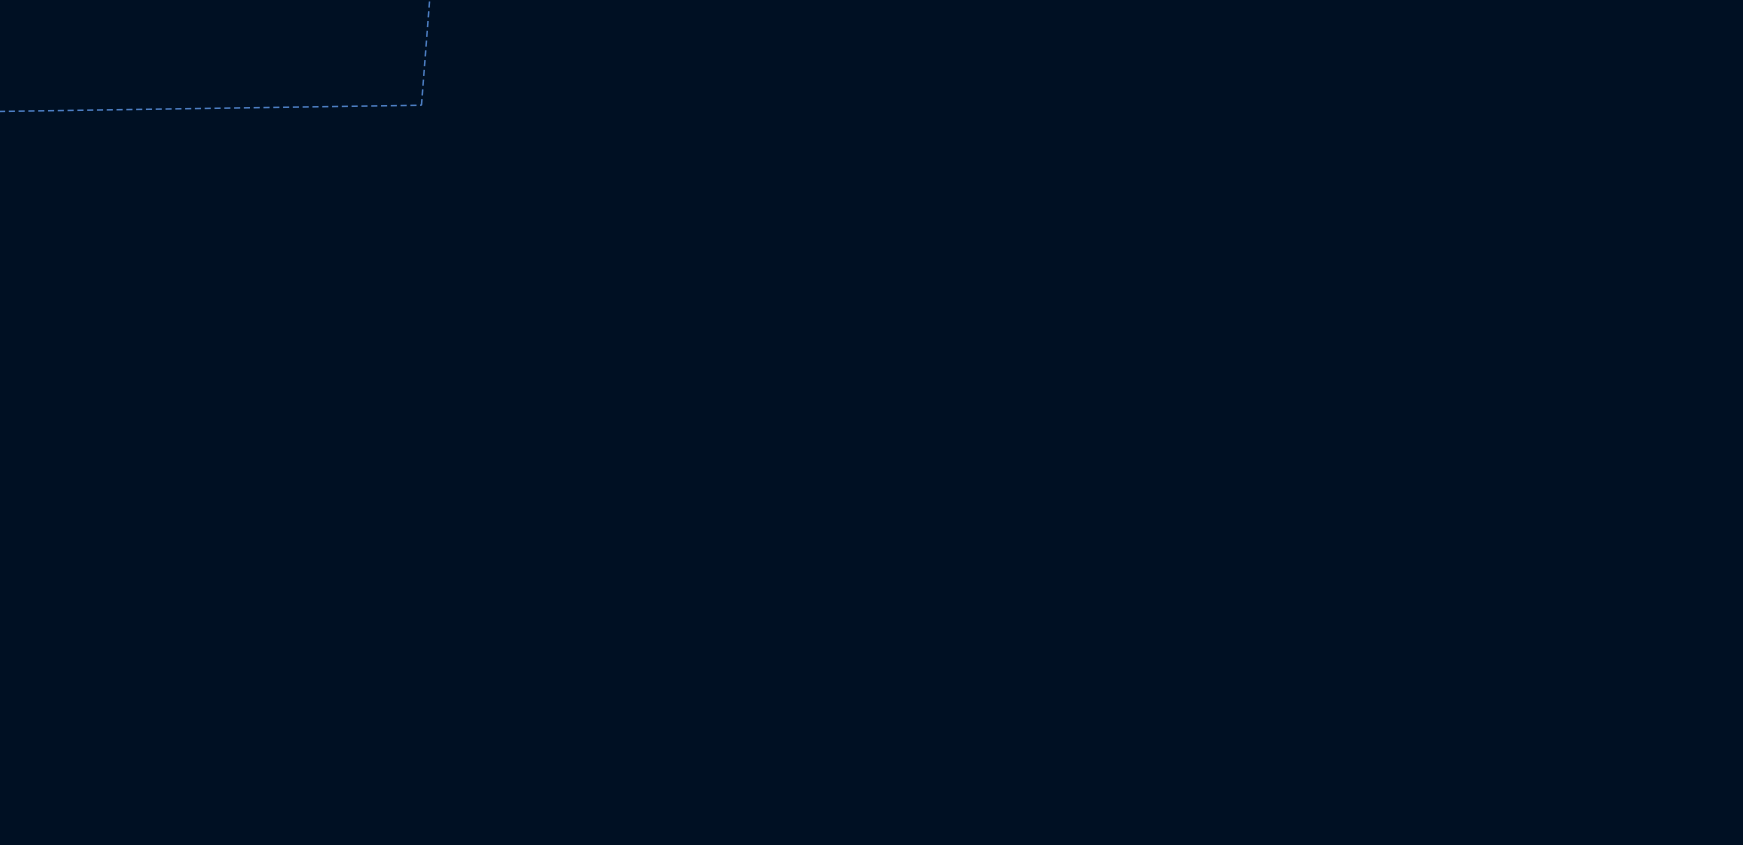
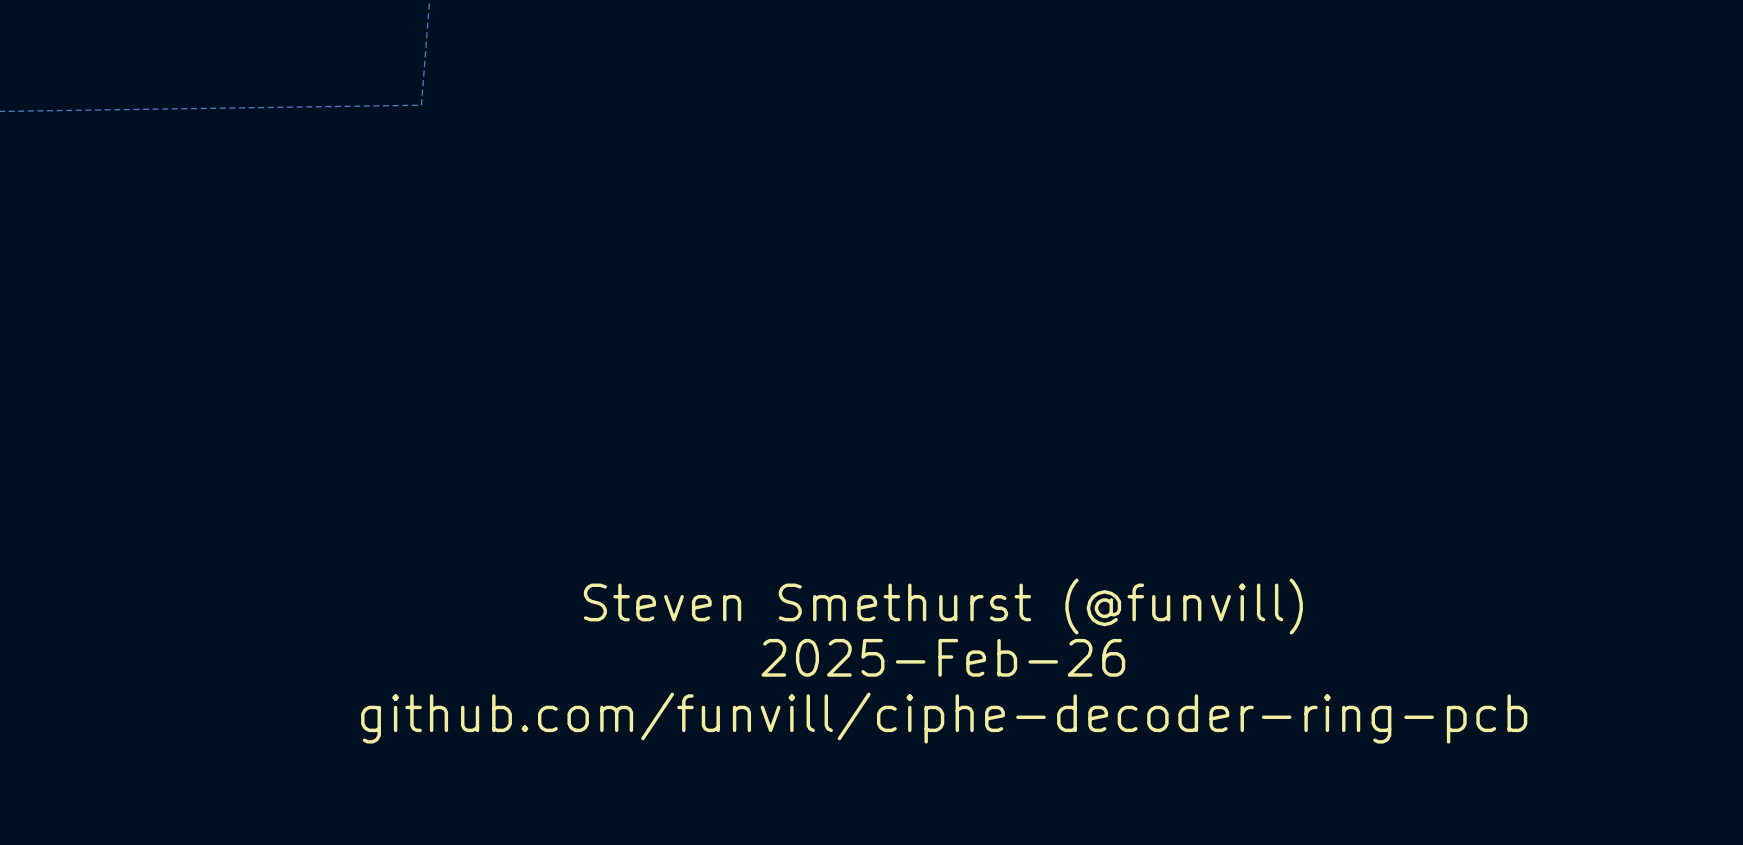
text: none -> Steven Smethurst (@funvill) (943, 606)
text: none -> 2025-Feb-26 (943, 657)
text: none -> github.com/funvill/ciphe-decoder-ring-pcb (944, 718)

